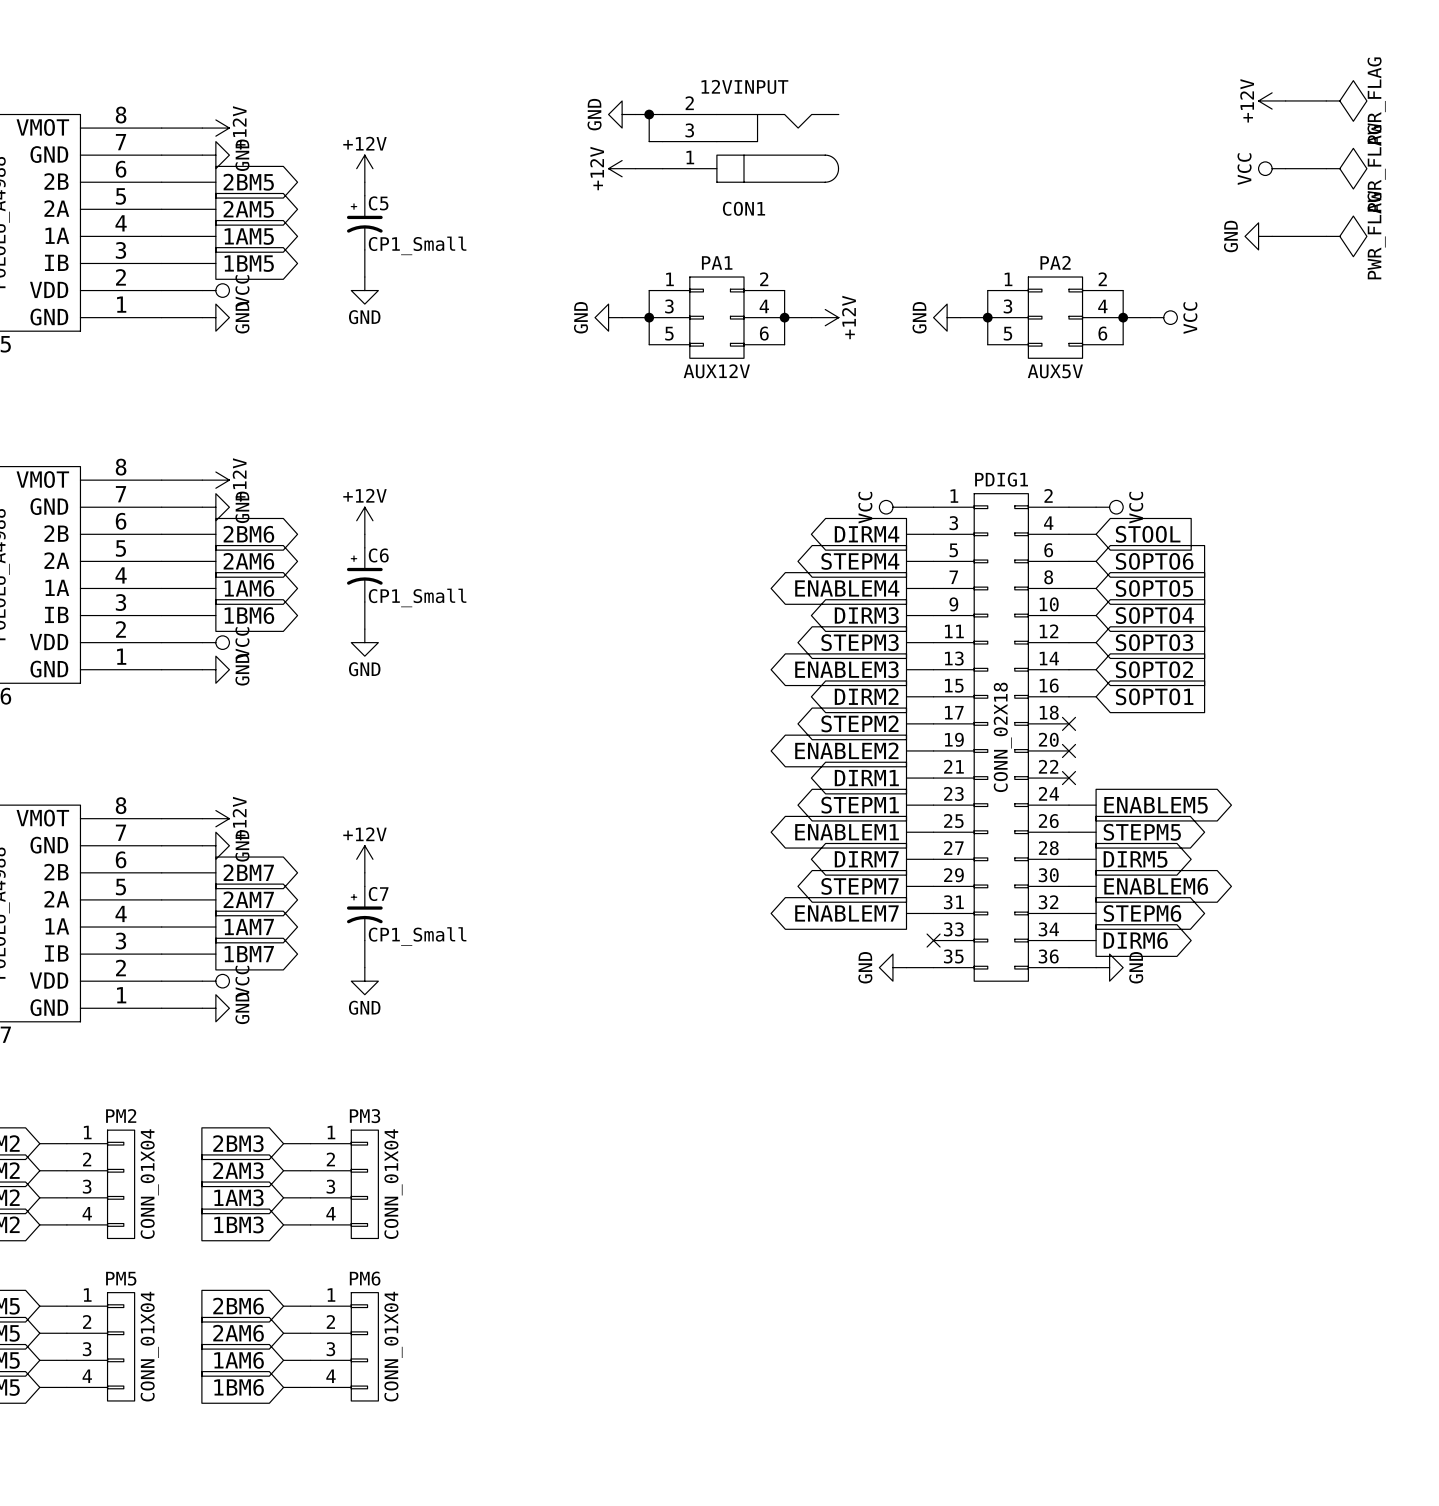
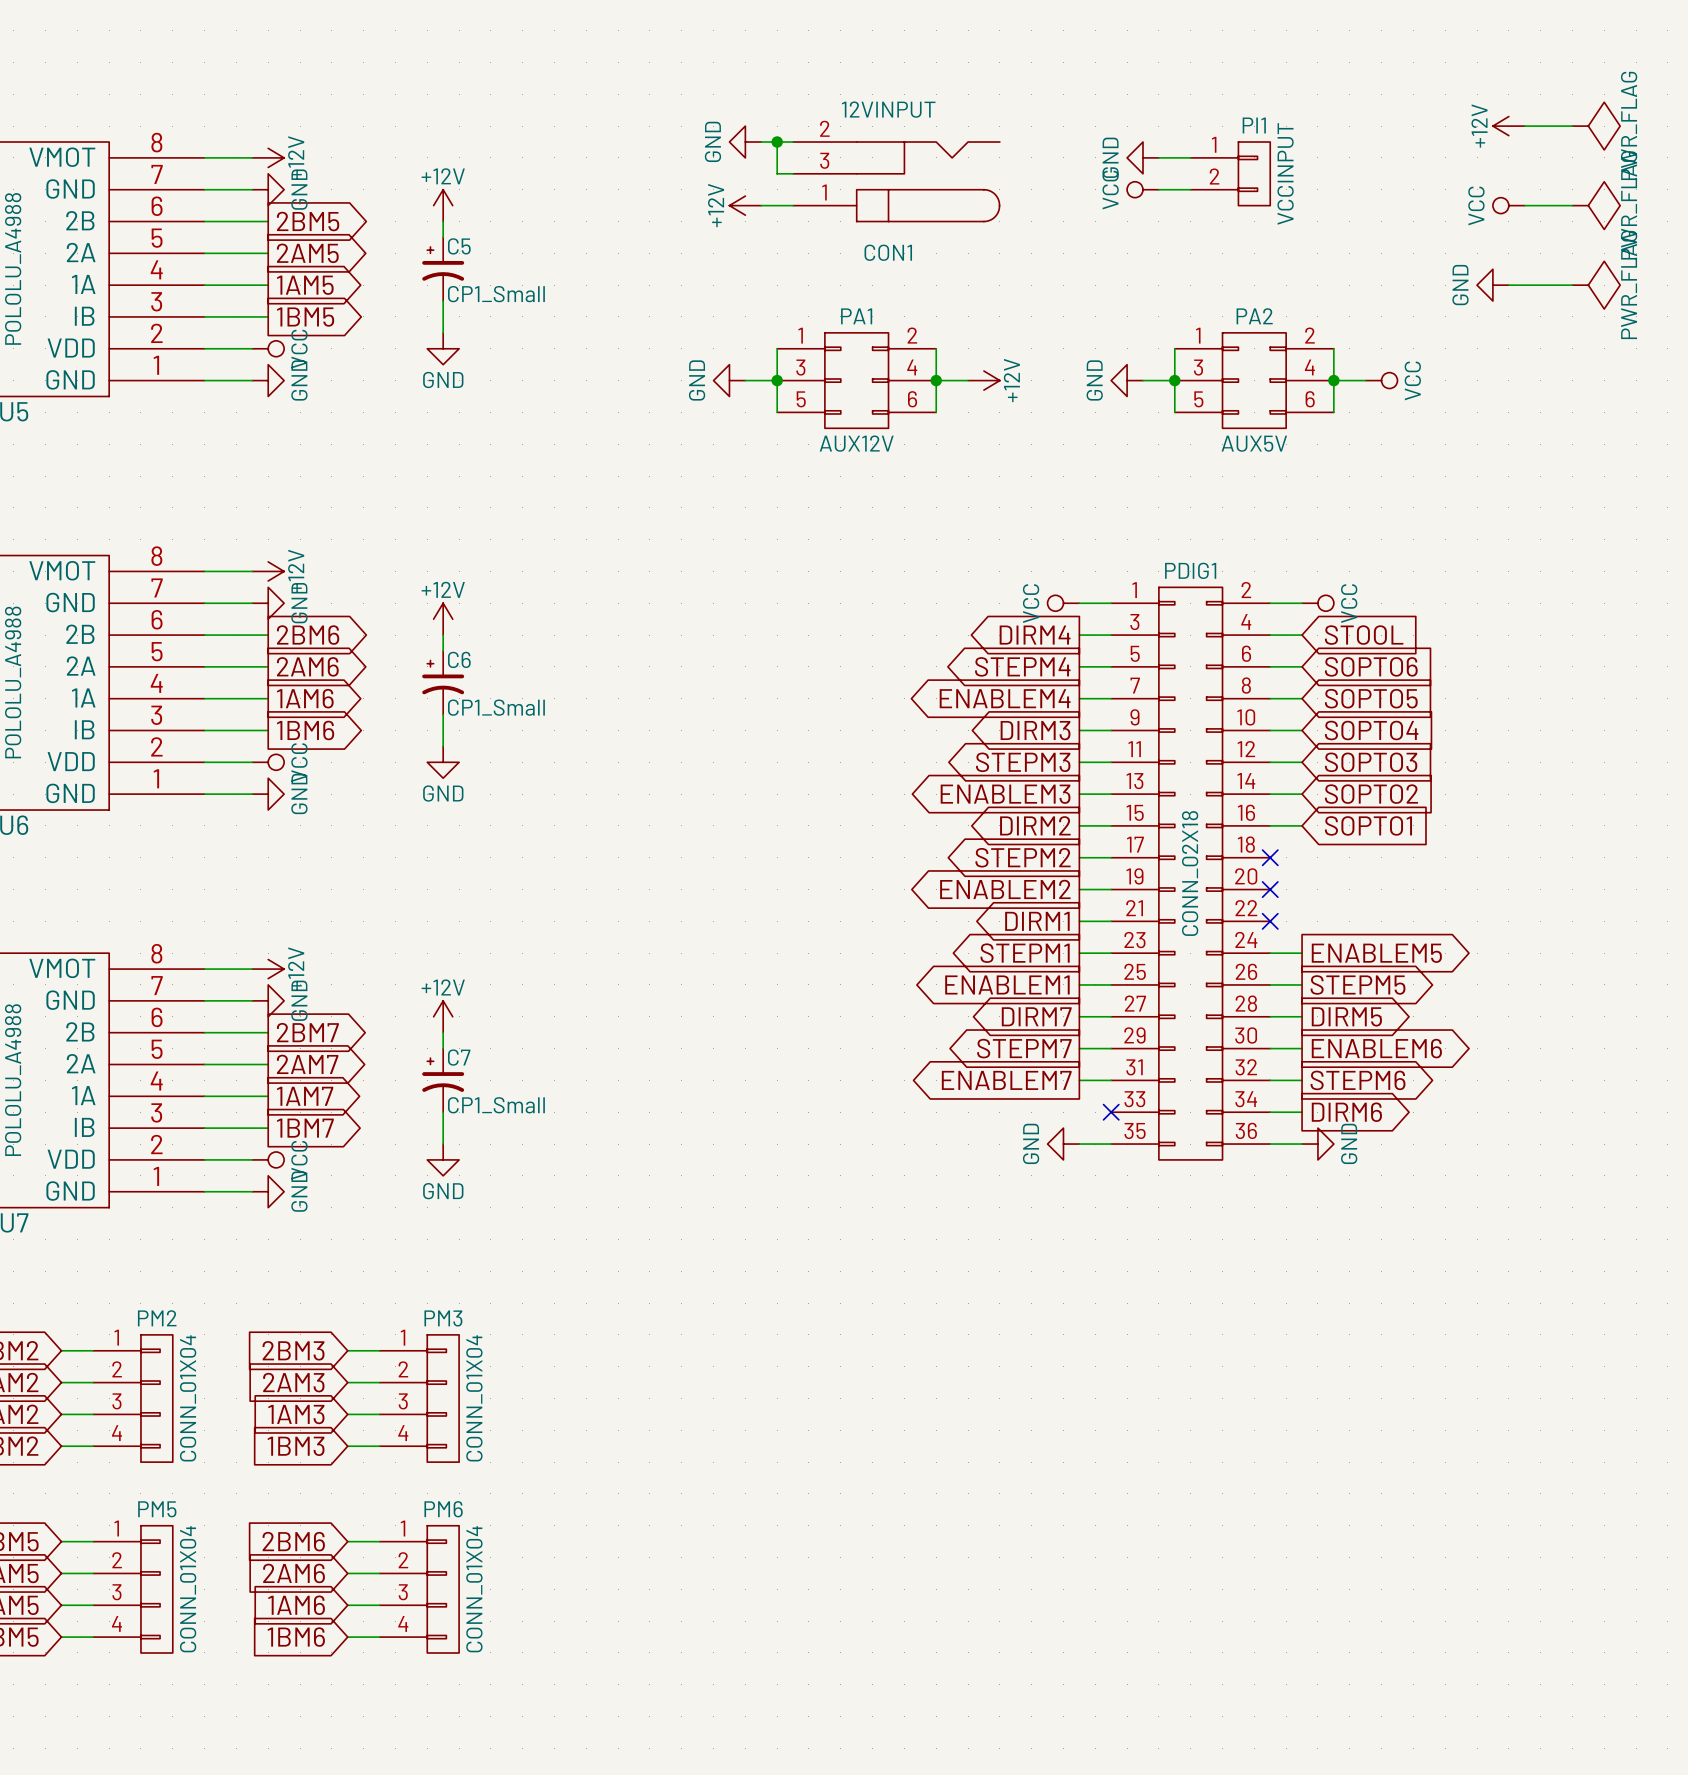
power symbol: none -> GND (1142, 157)
wire: none -> (1158, 157) (1190, 157)
PI1: none -> VCCINPUT (1230, 173)
power symbol: none -> VCC (1142, 189)
wire: none -> (1158, 189) (1190, 189)

